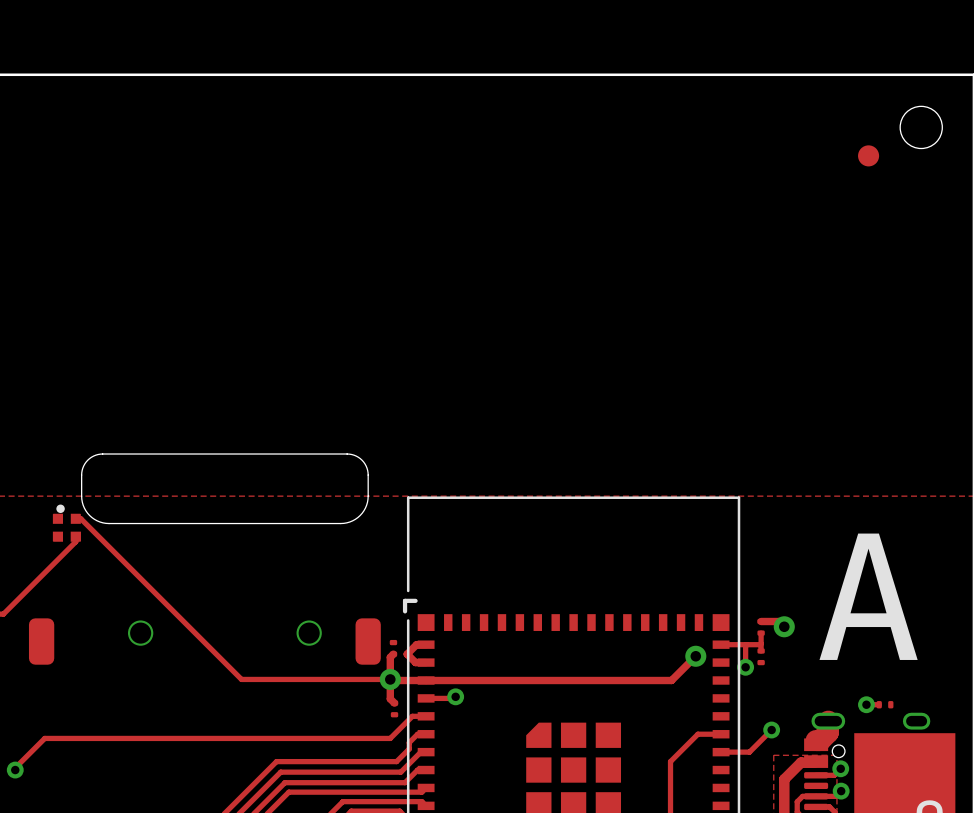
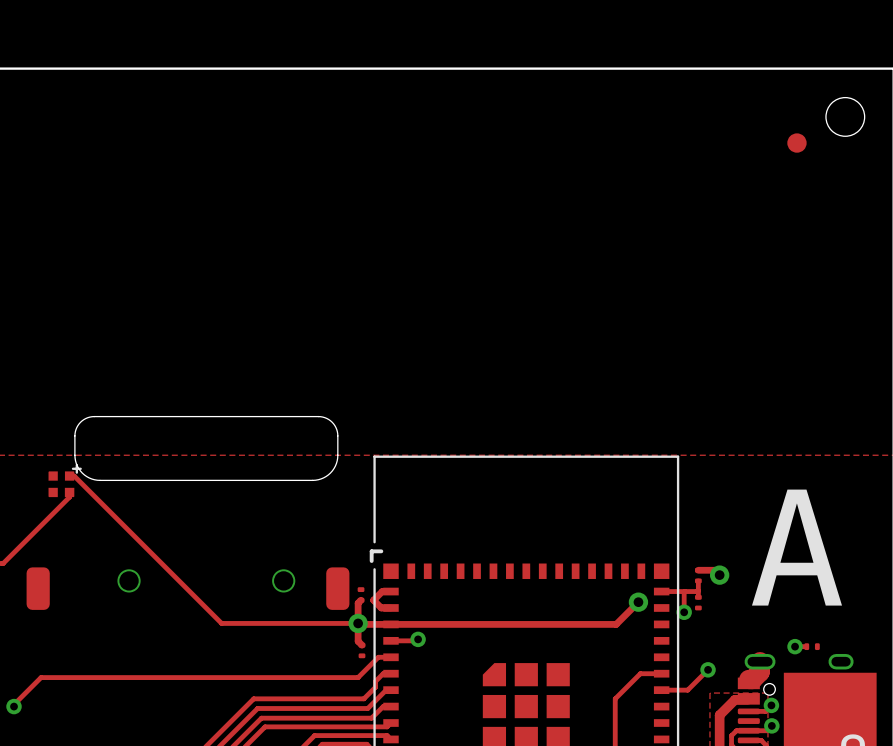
part footprint: [52, 504, 81, 542] -> [48, 463, 82, 498]

